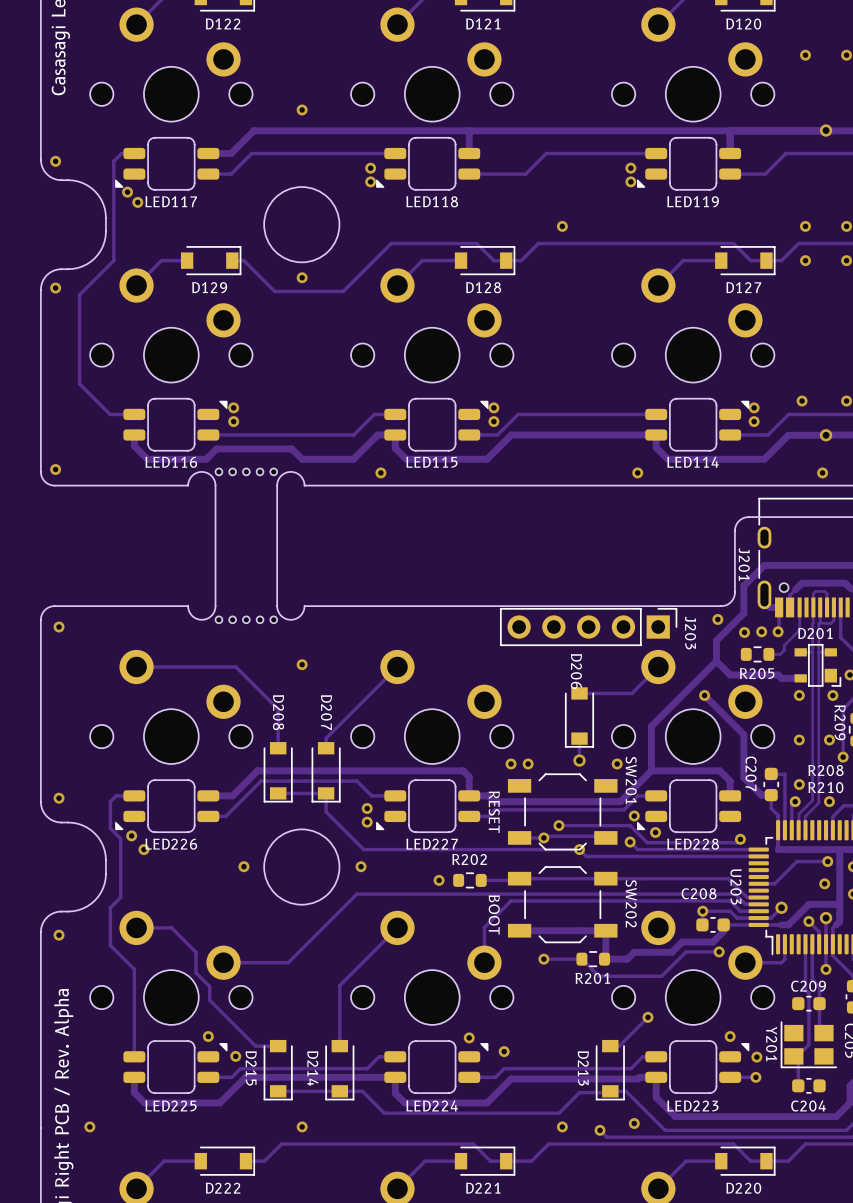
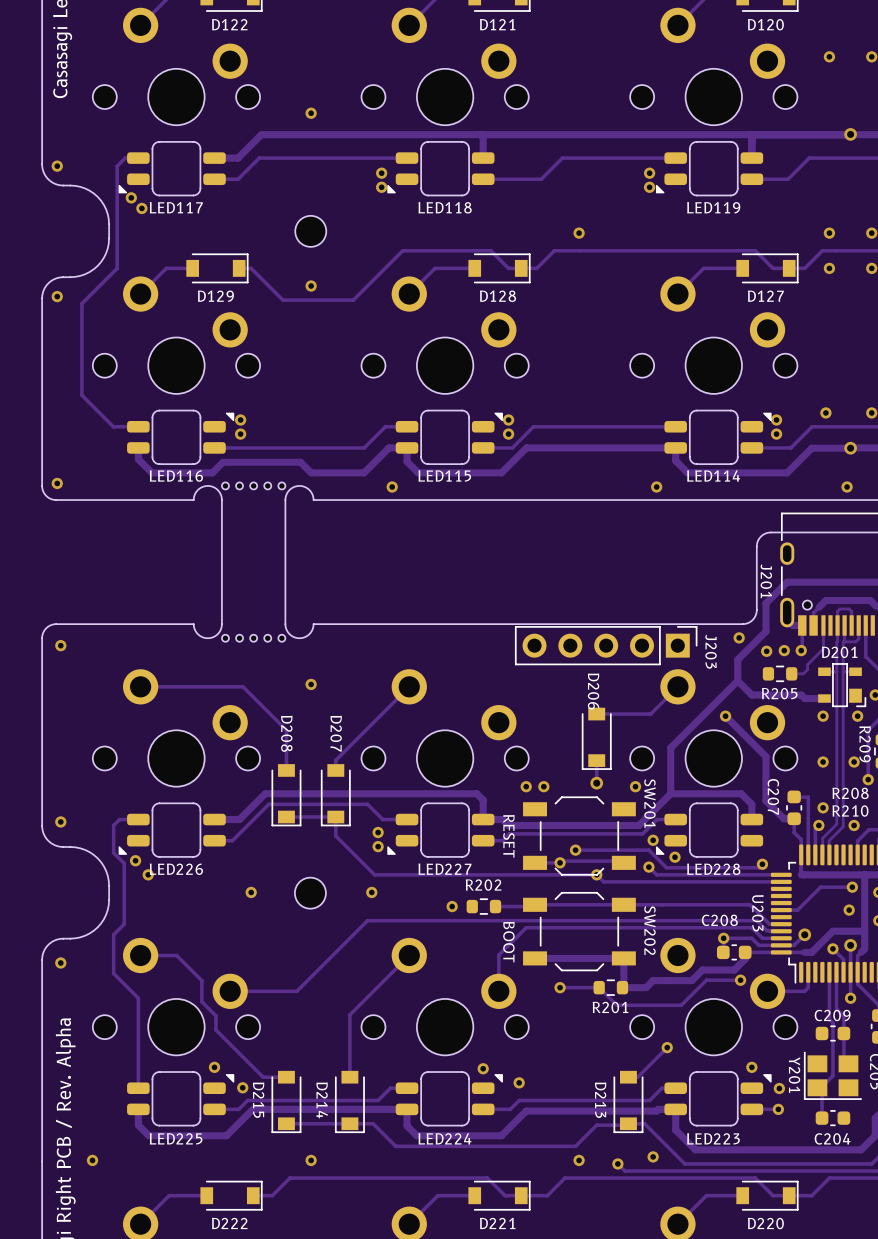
round board edge: [263, 186, 341, 264] -> none
part: none -> (310, 231)
round board edge: [263, 828, 341, 906] -> none
part: none -> (310, 893)

